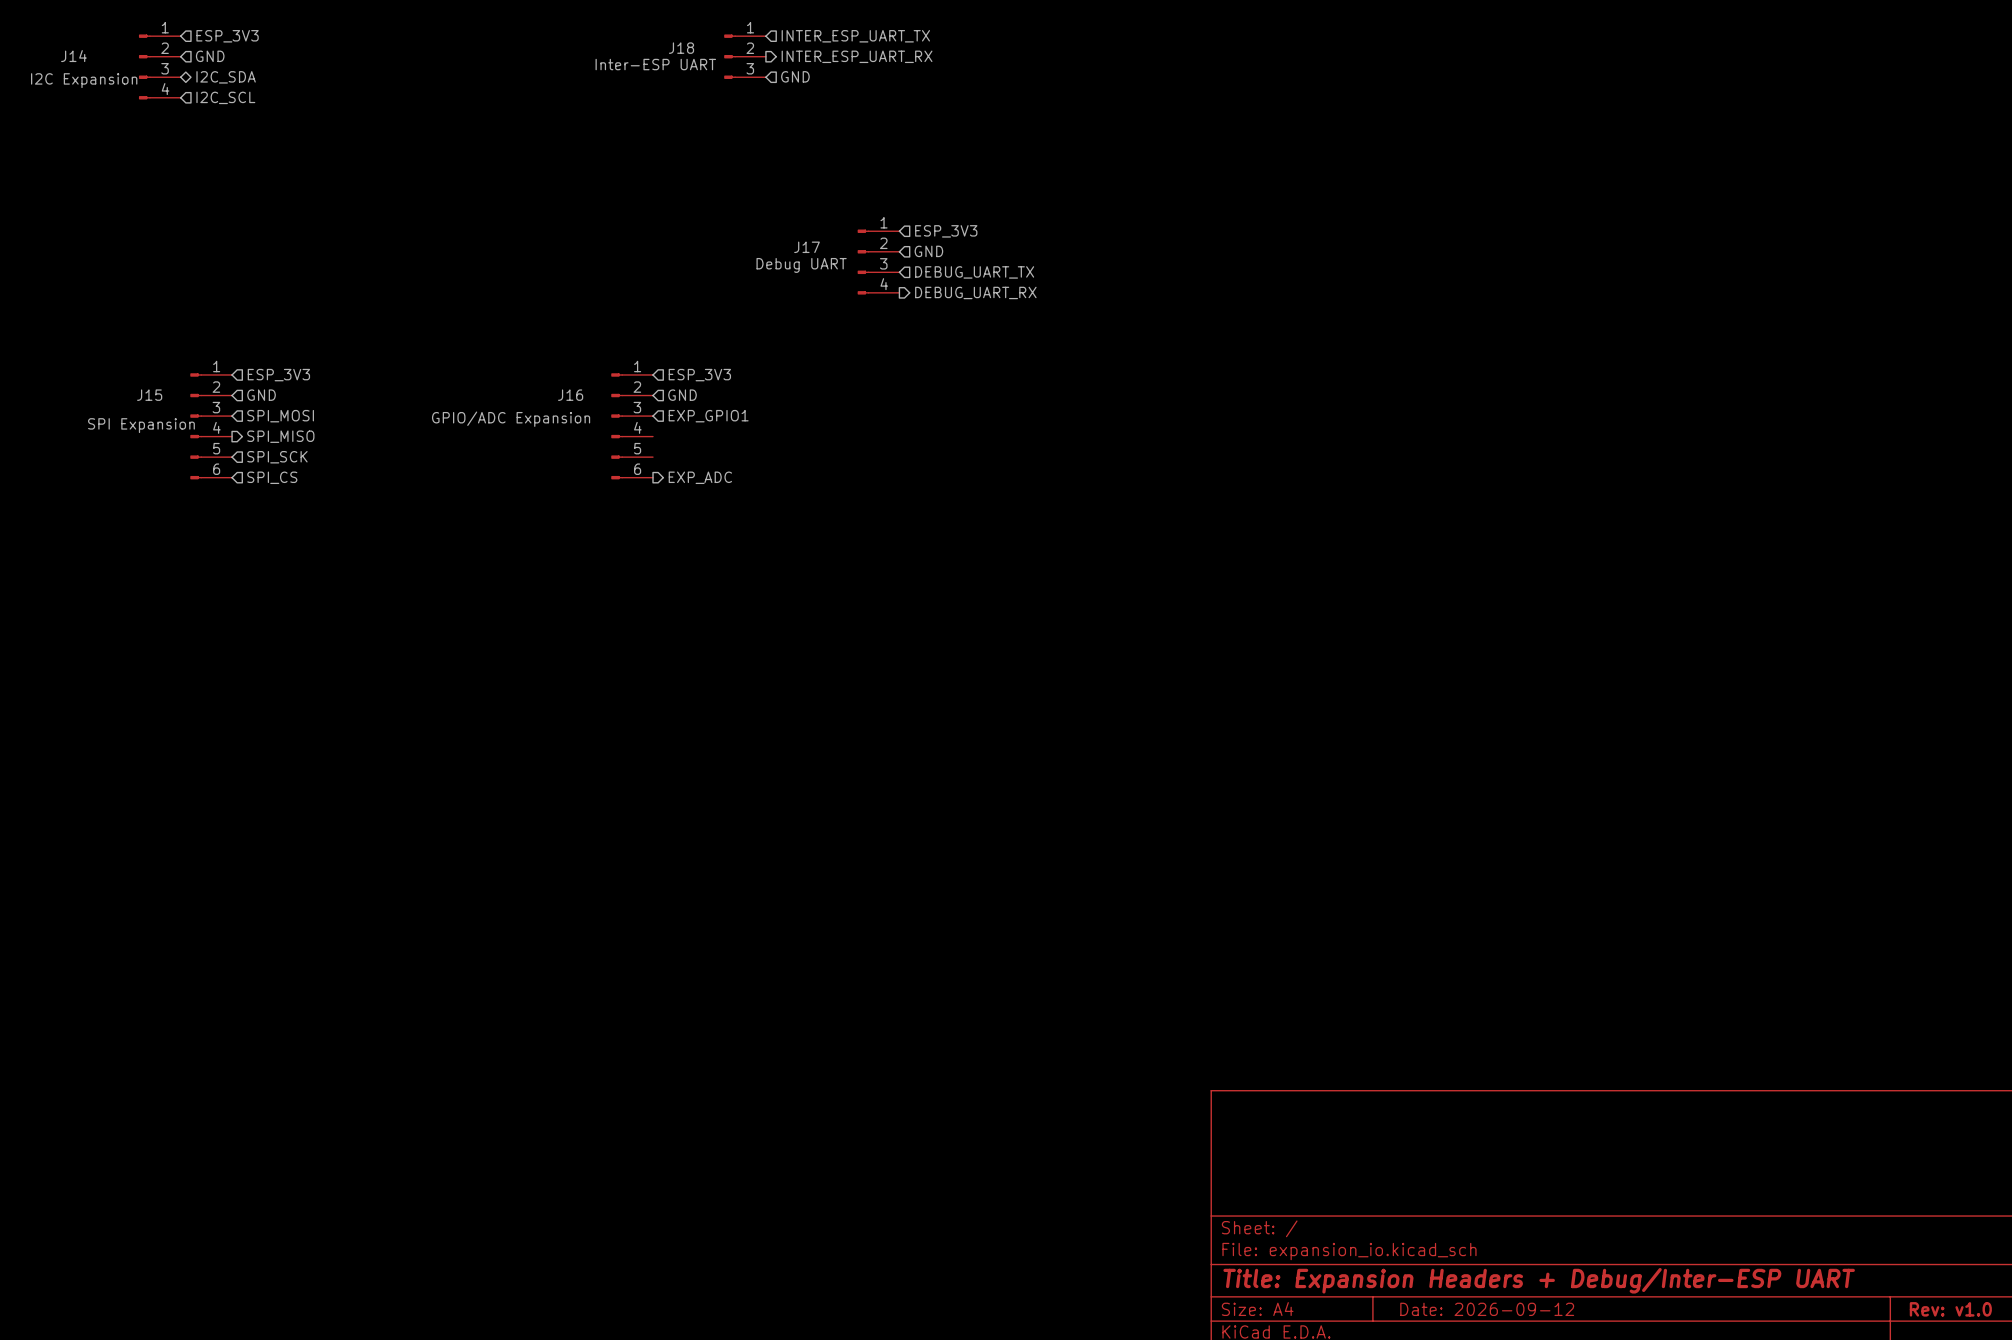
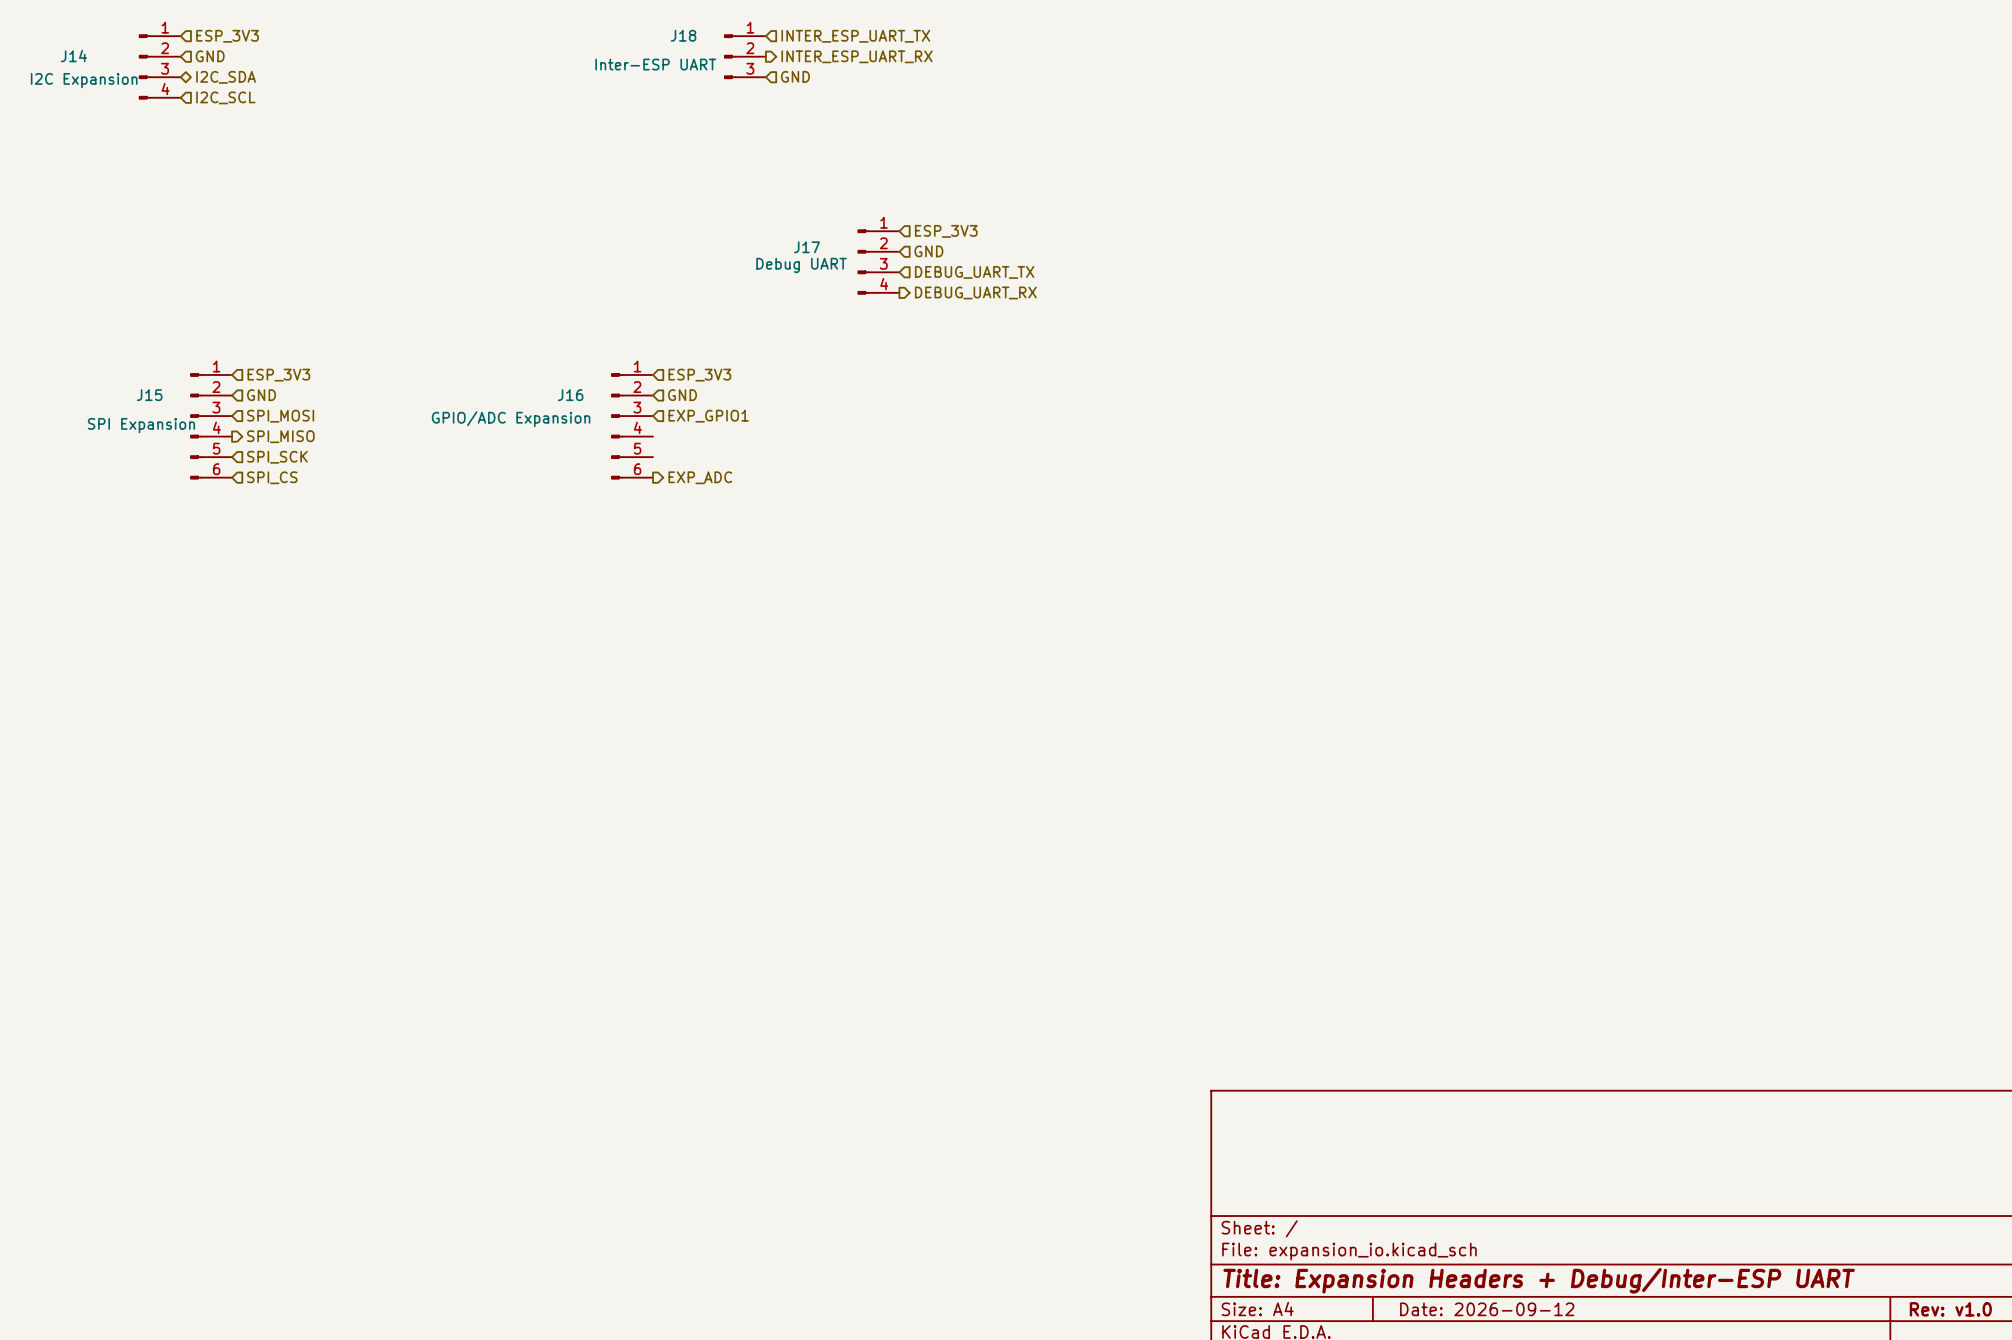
J18 name position: J18 (681, 48) -> J18 (683, 35)

